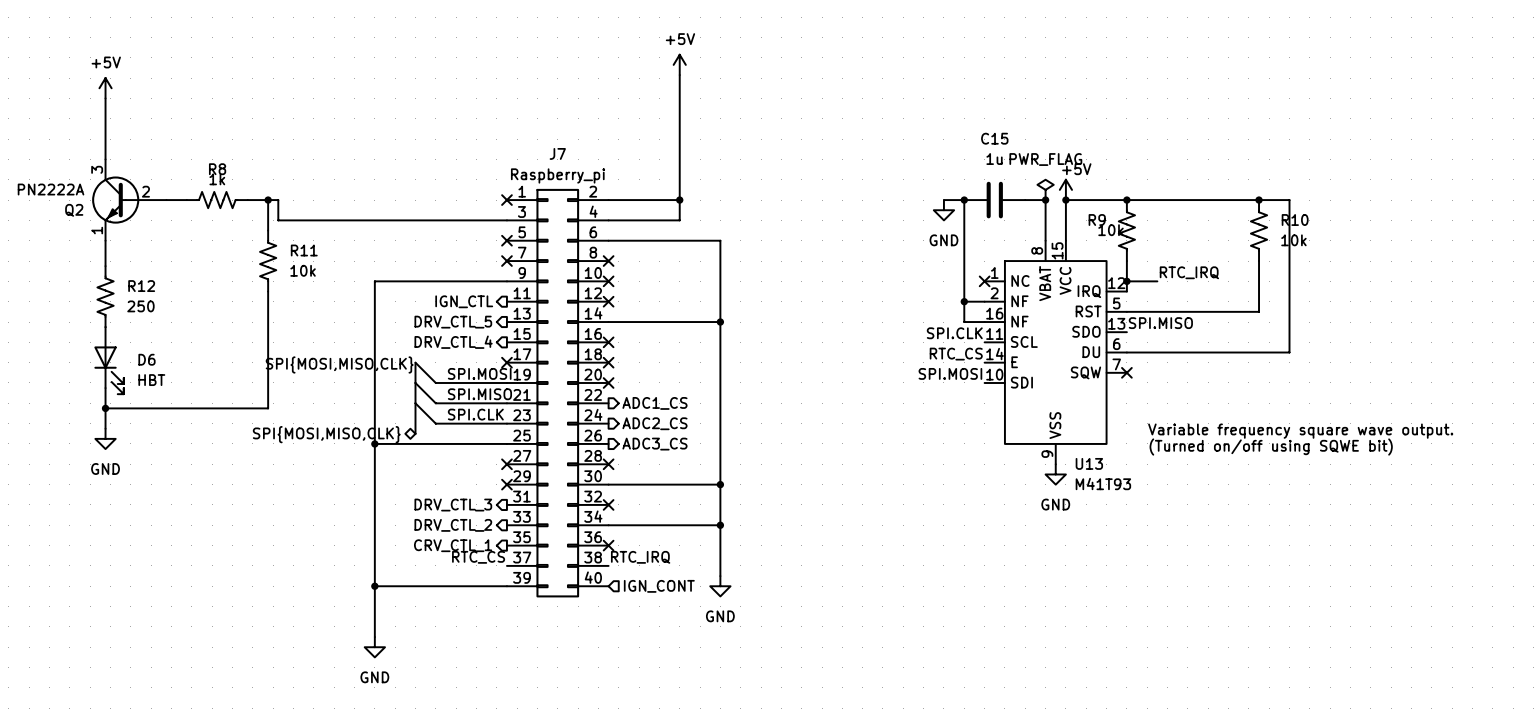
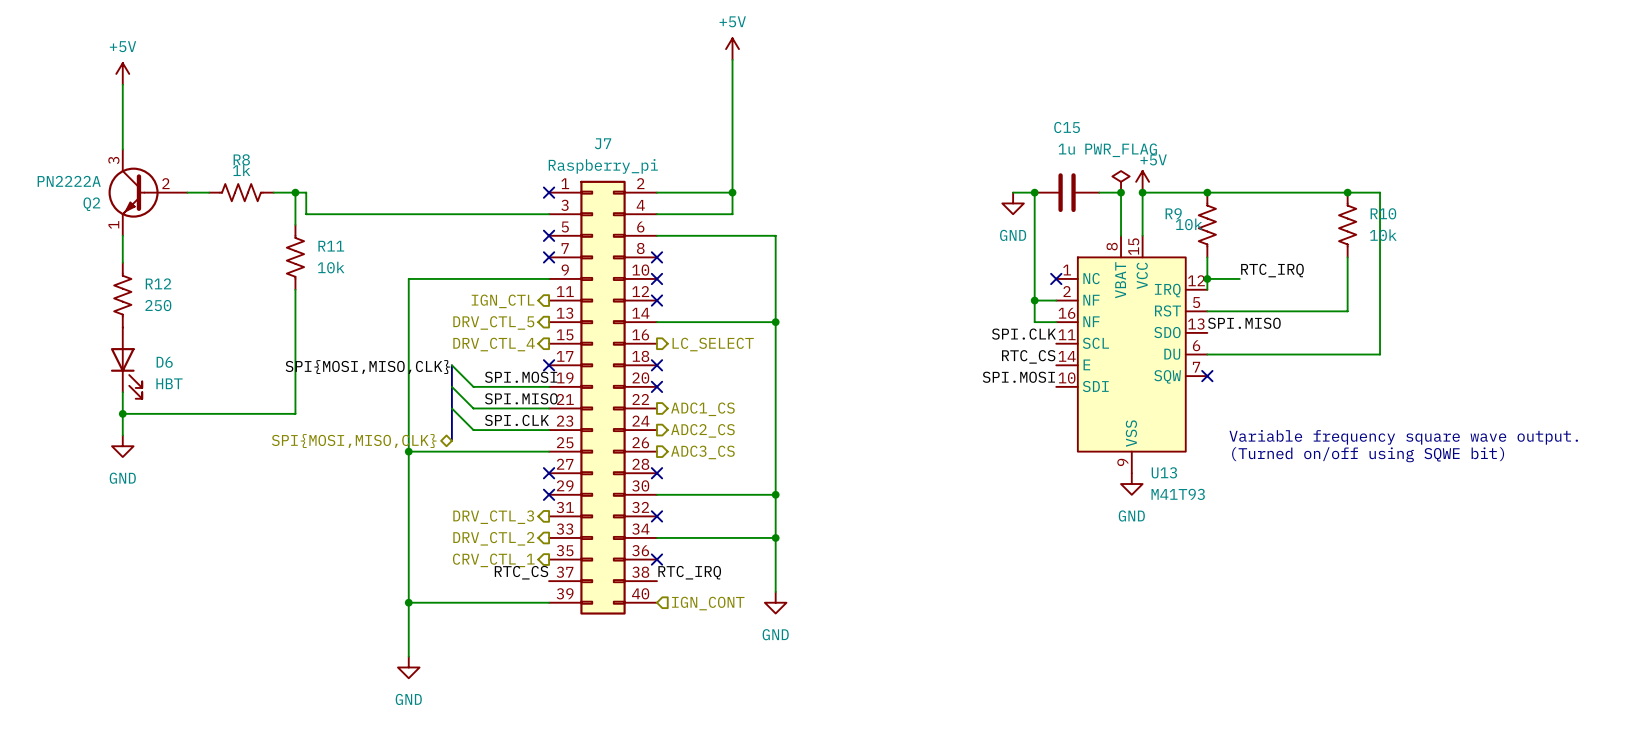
no-connect mark: (608, 342) -> none
hierarchical label: none -> LC_SELECT (713, 344)

